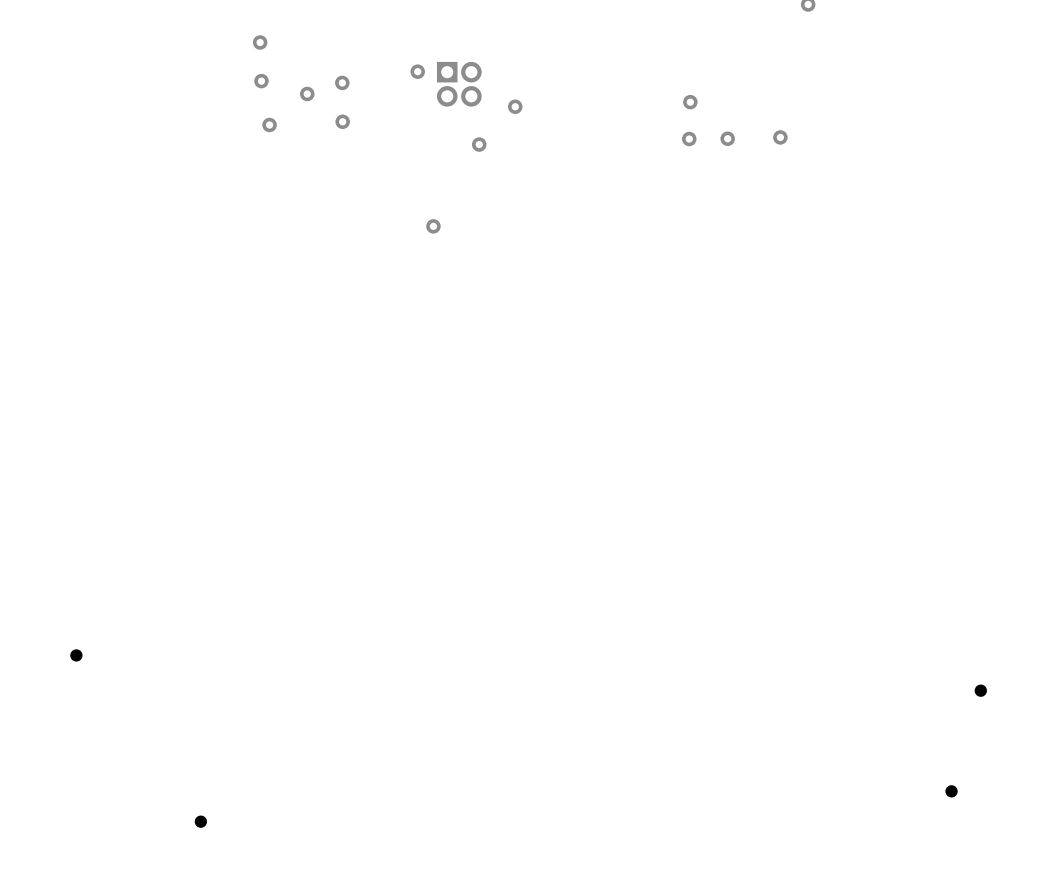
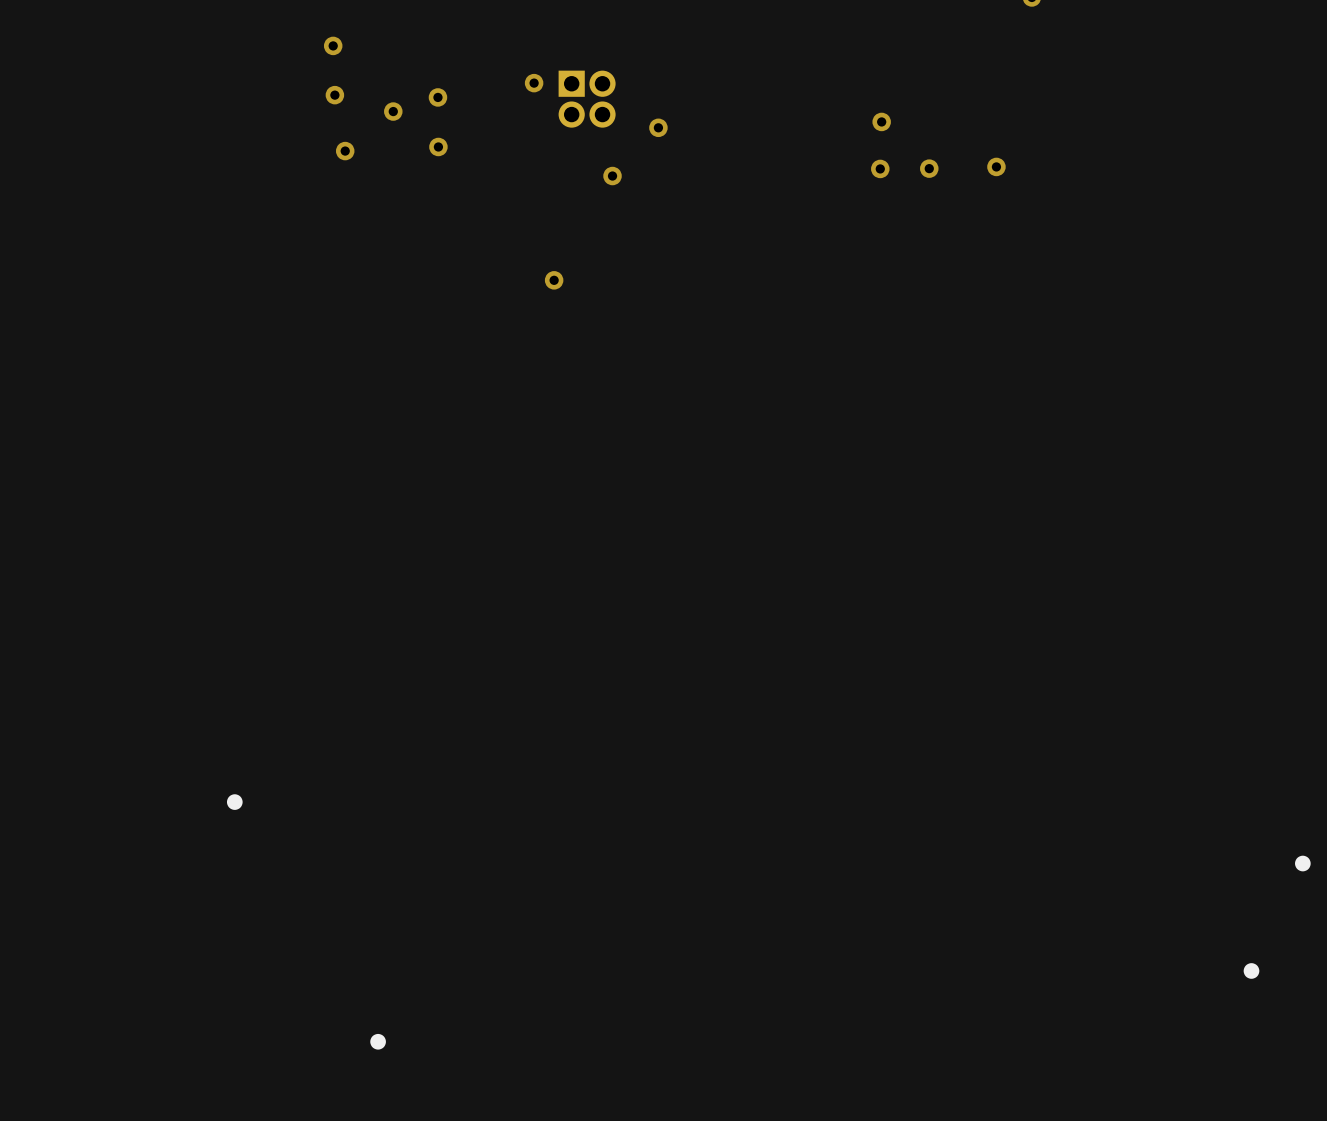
part: none -> (234, 802)
part: (76, 655) -> none
part: none -> (1302, 863)
part: (980, 690) -> none
part position: (951, 791) -> (1251, 970)
part: (200, 821) -> none
part: none -> (378, 1041)

